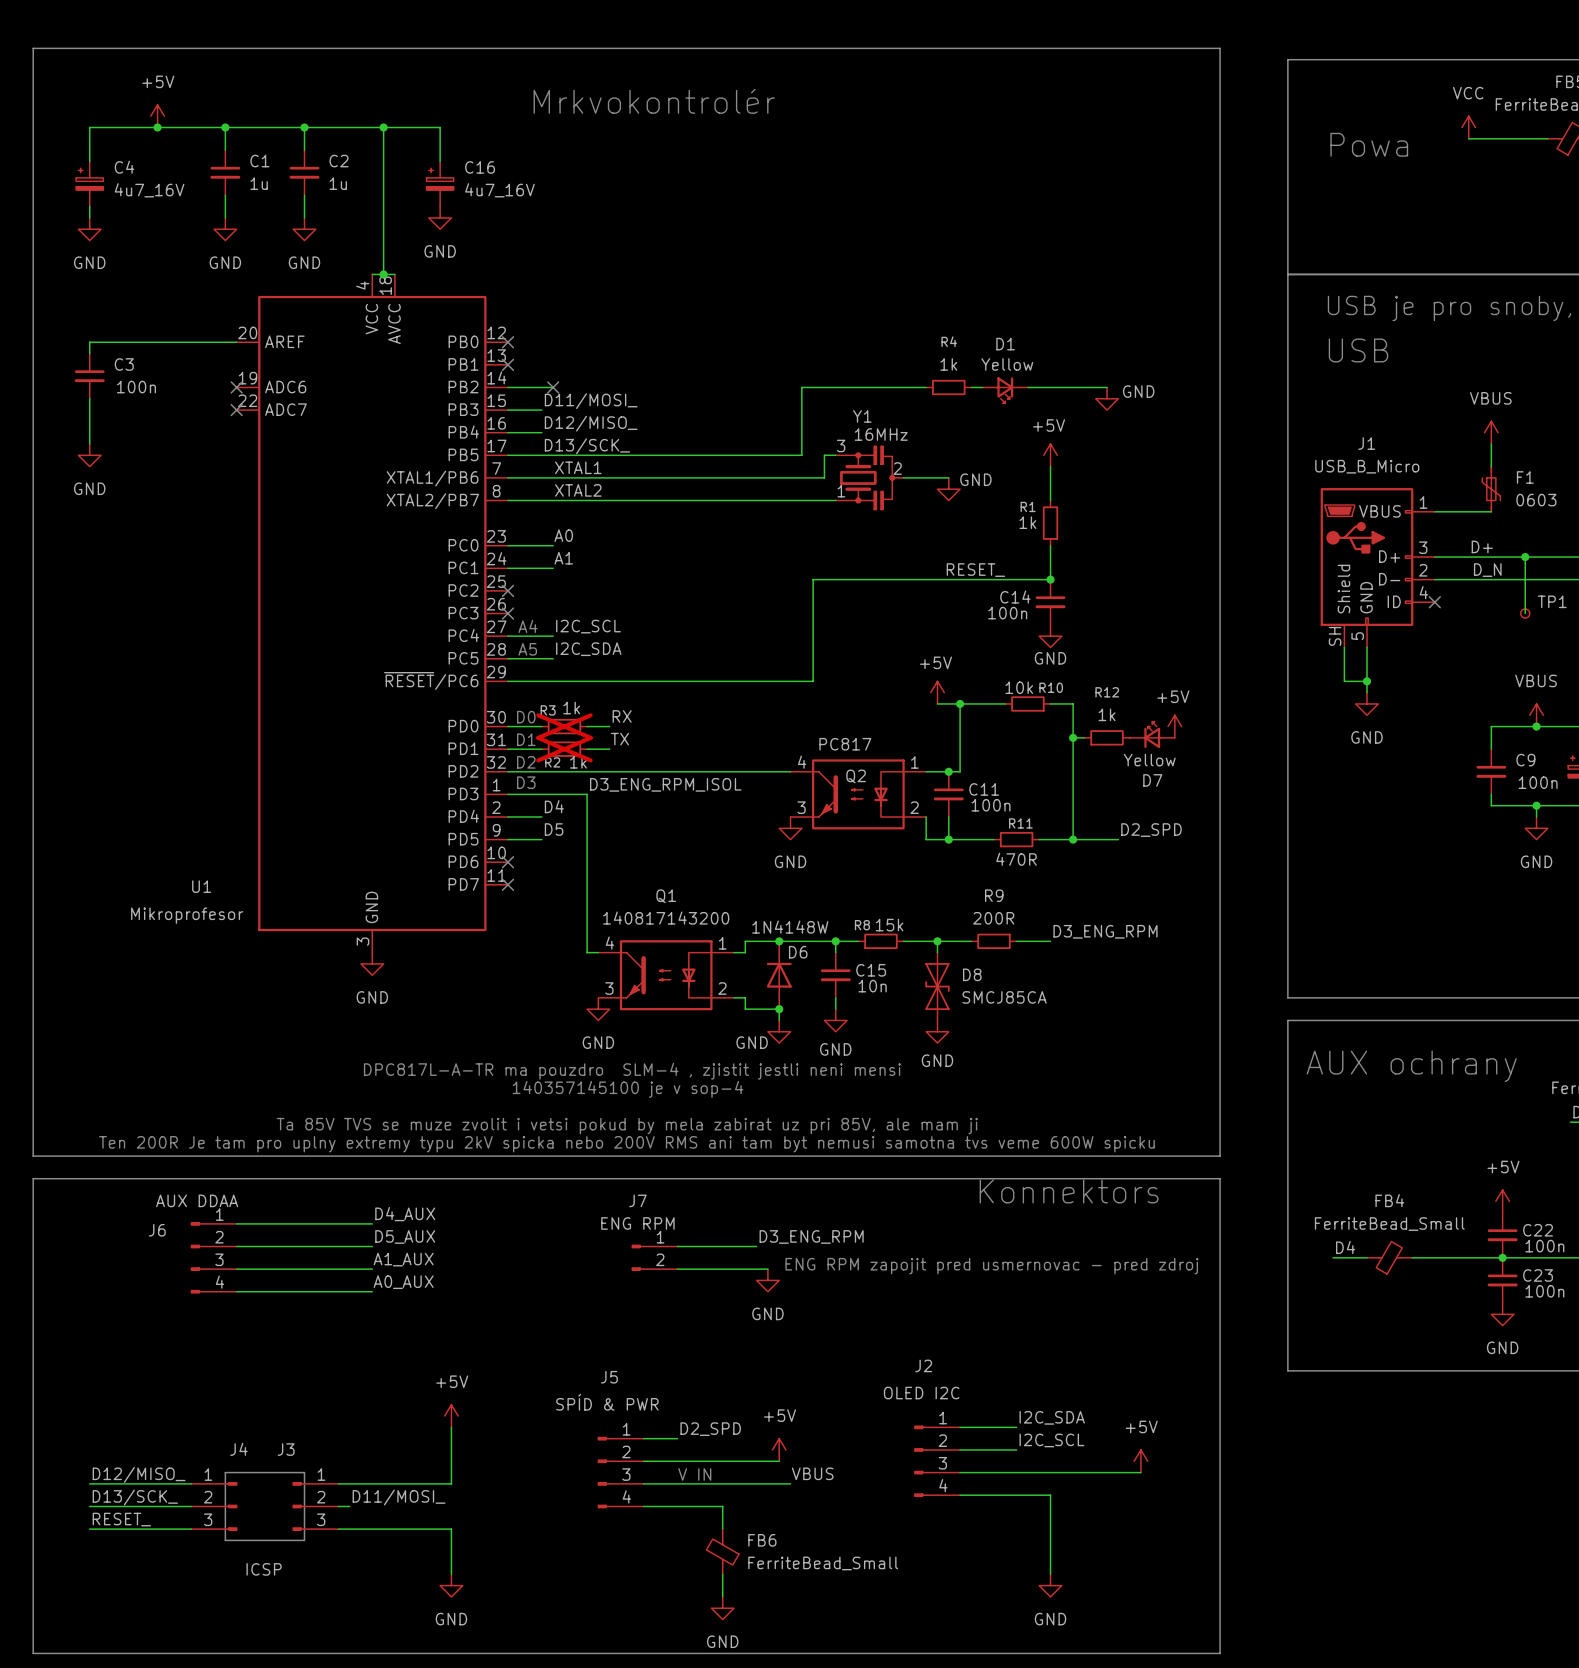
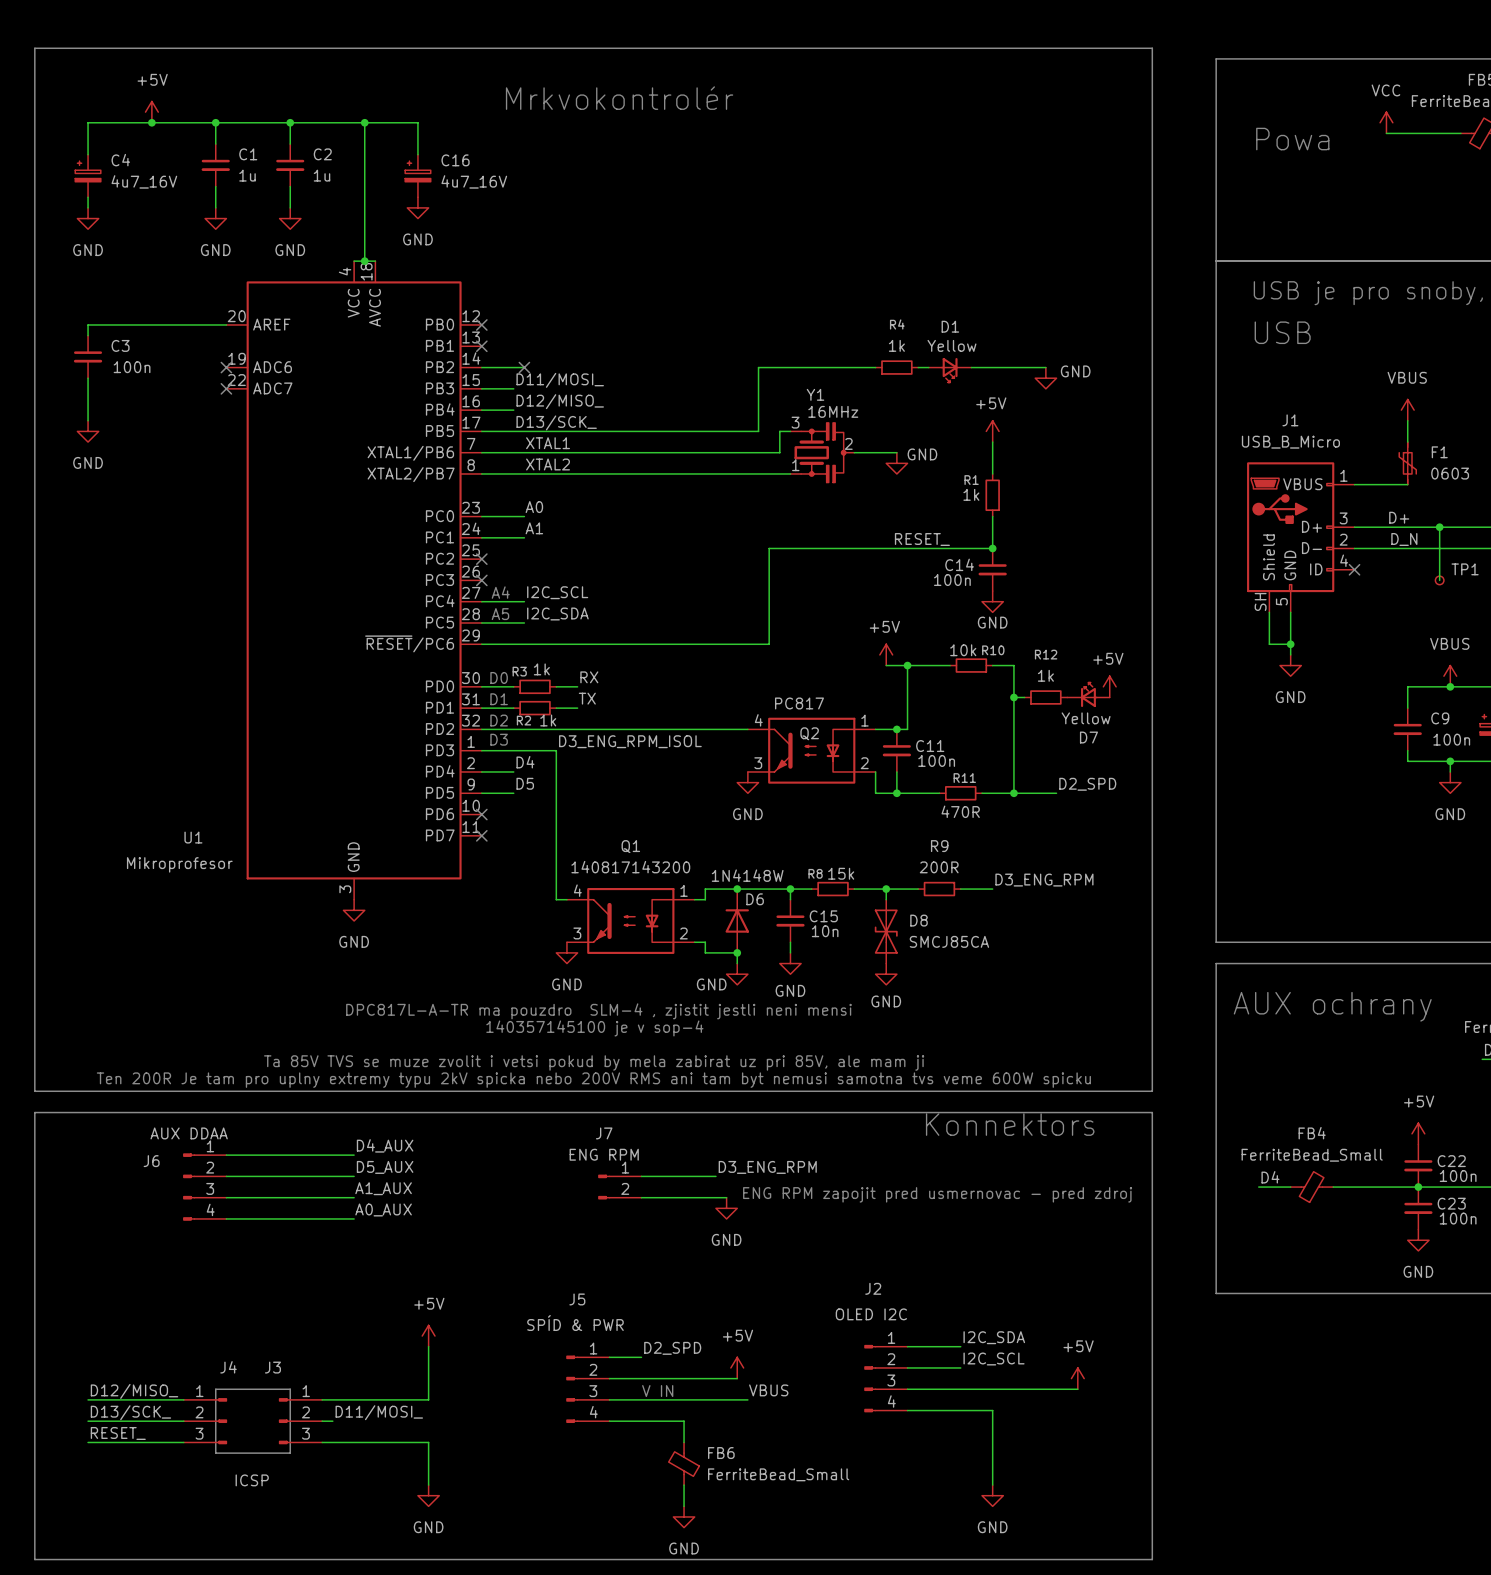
R3 do-not-place cross: (564, 726) -> none
R2 do-not-place cross: (564, 749) -> none

